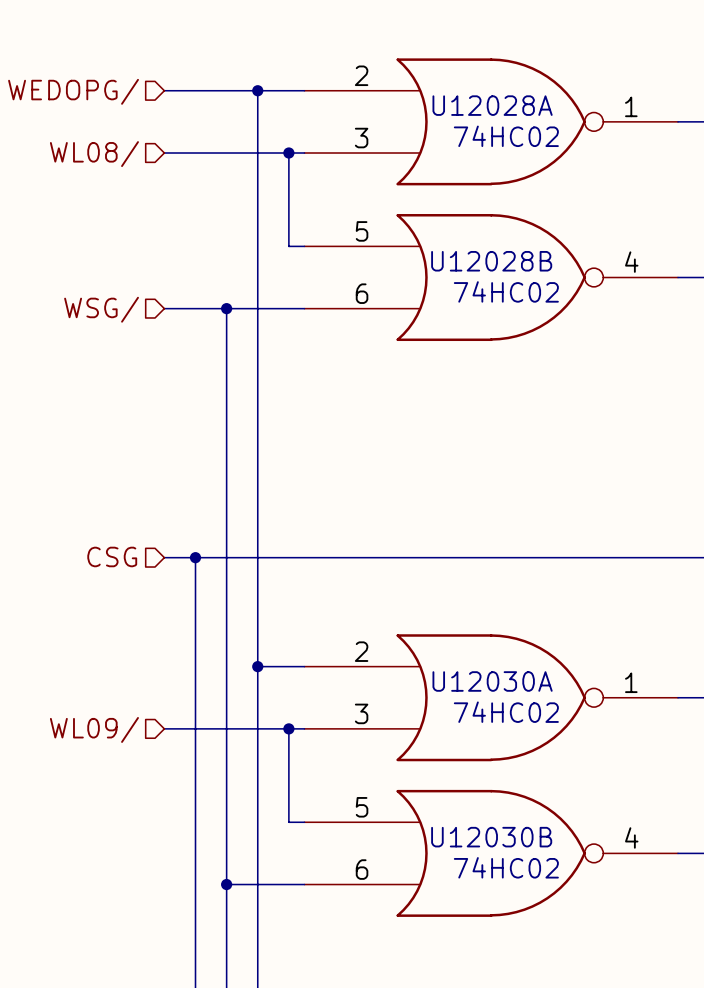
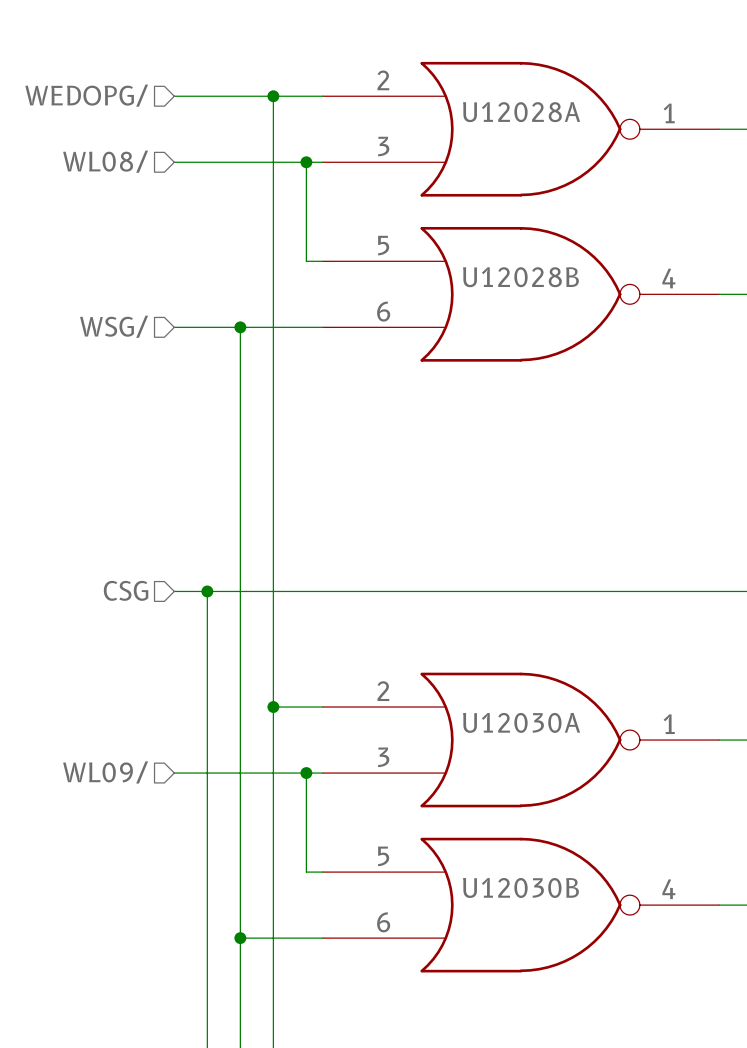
U12028A value: 74HC02 (506, 136) -> none
U12028B value: 74HC02 (506, 291) -> none
U12030A value: 74HC02 (506, 712) -> none
U12030B value: 74HC02 (506, 867) -> none

